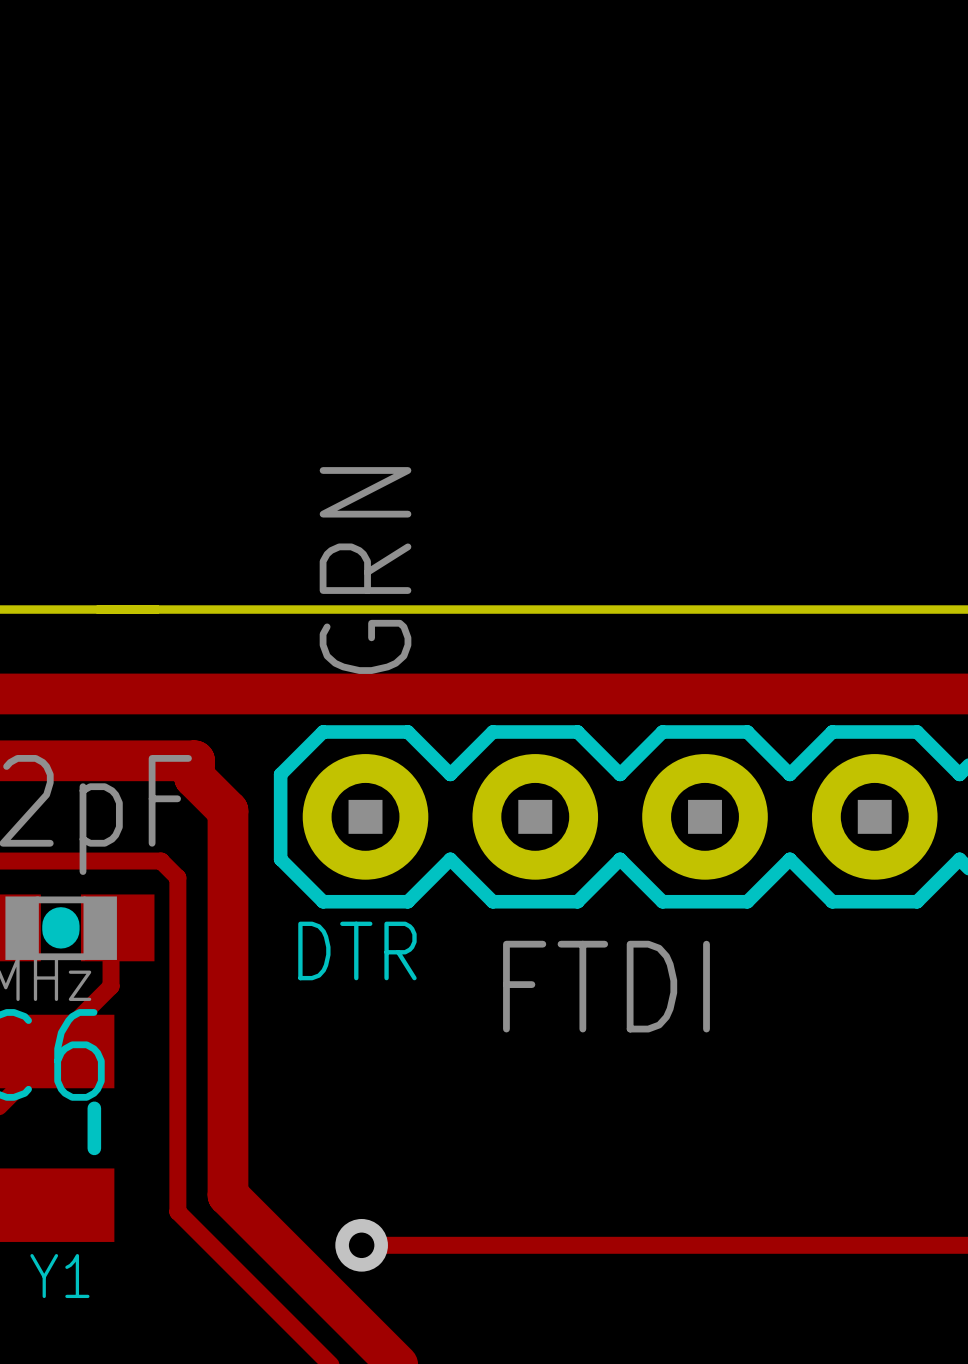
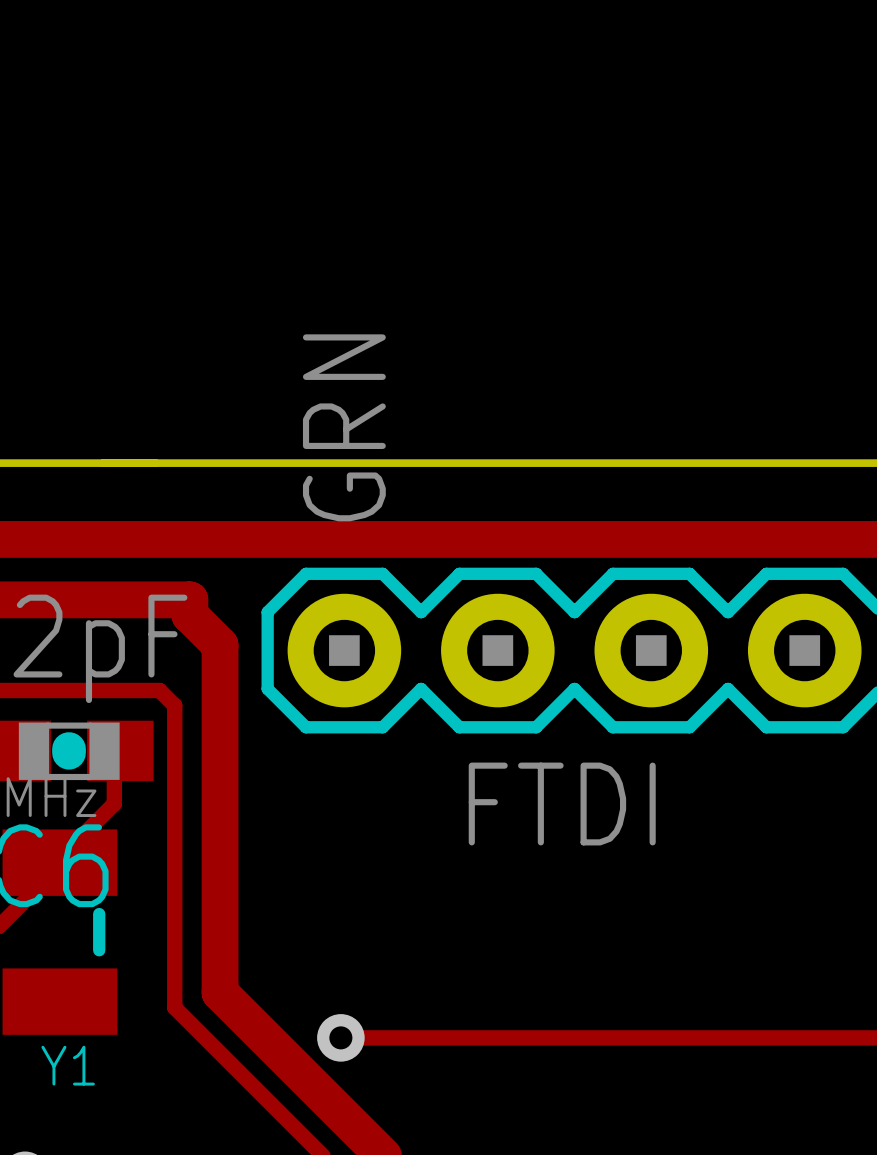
text: DTR (357, 950) -> none

